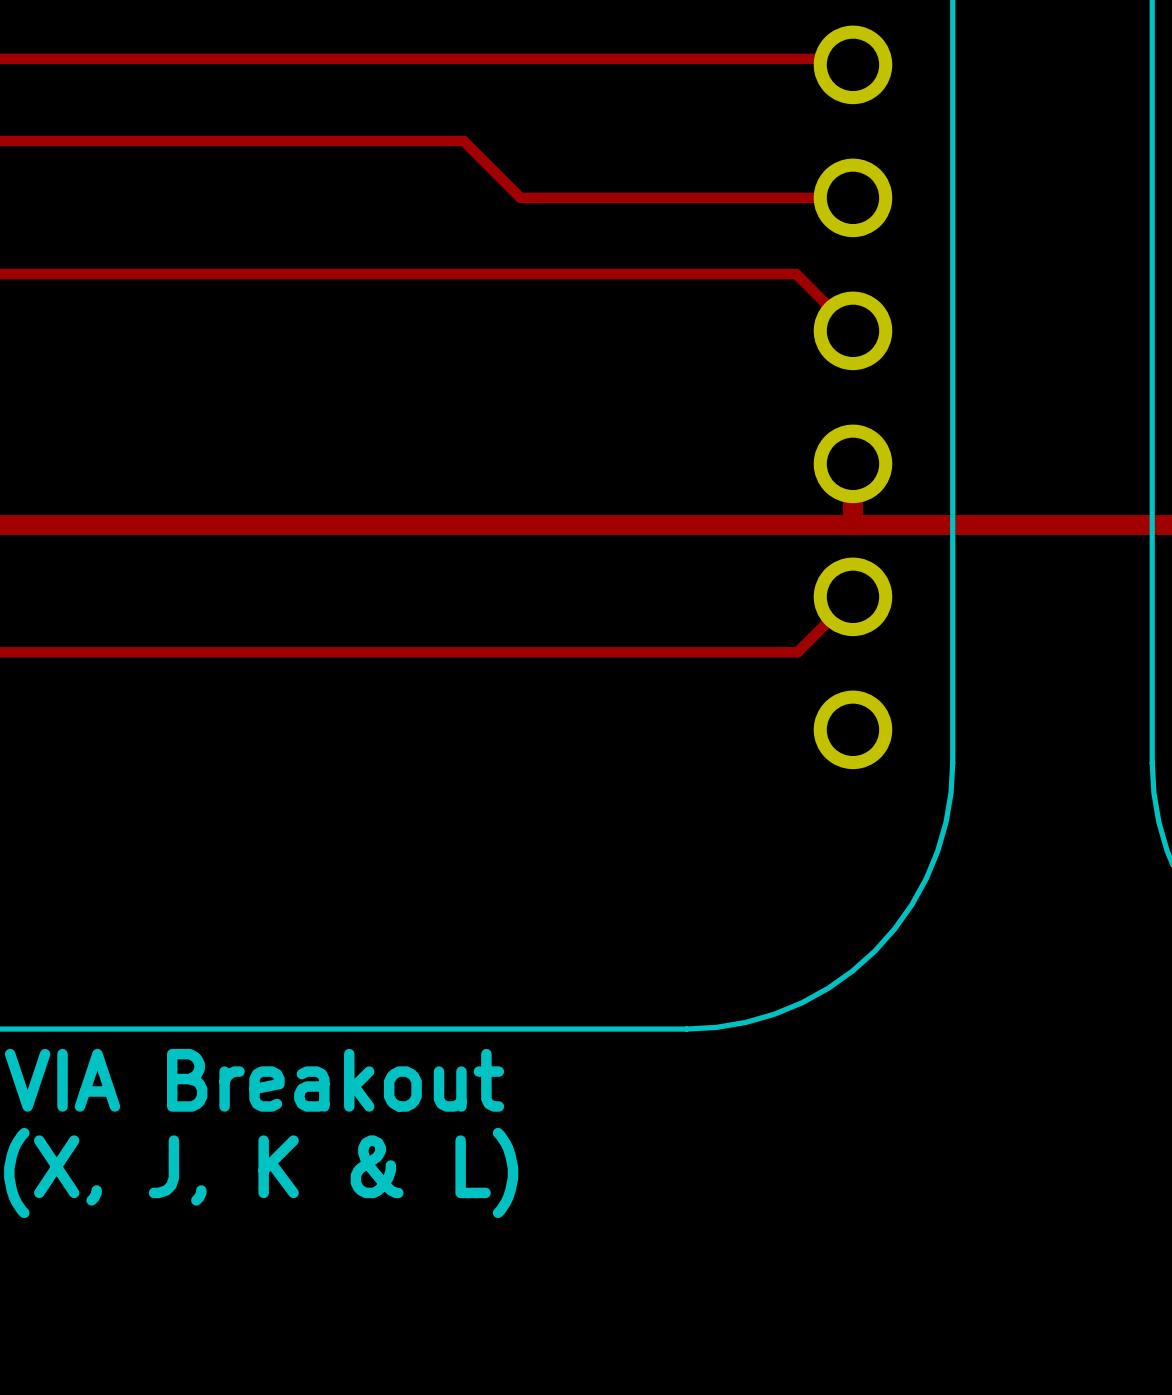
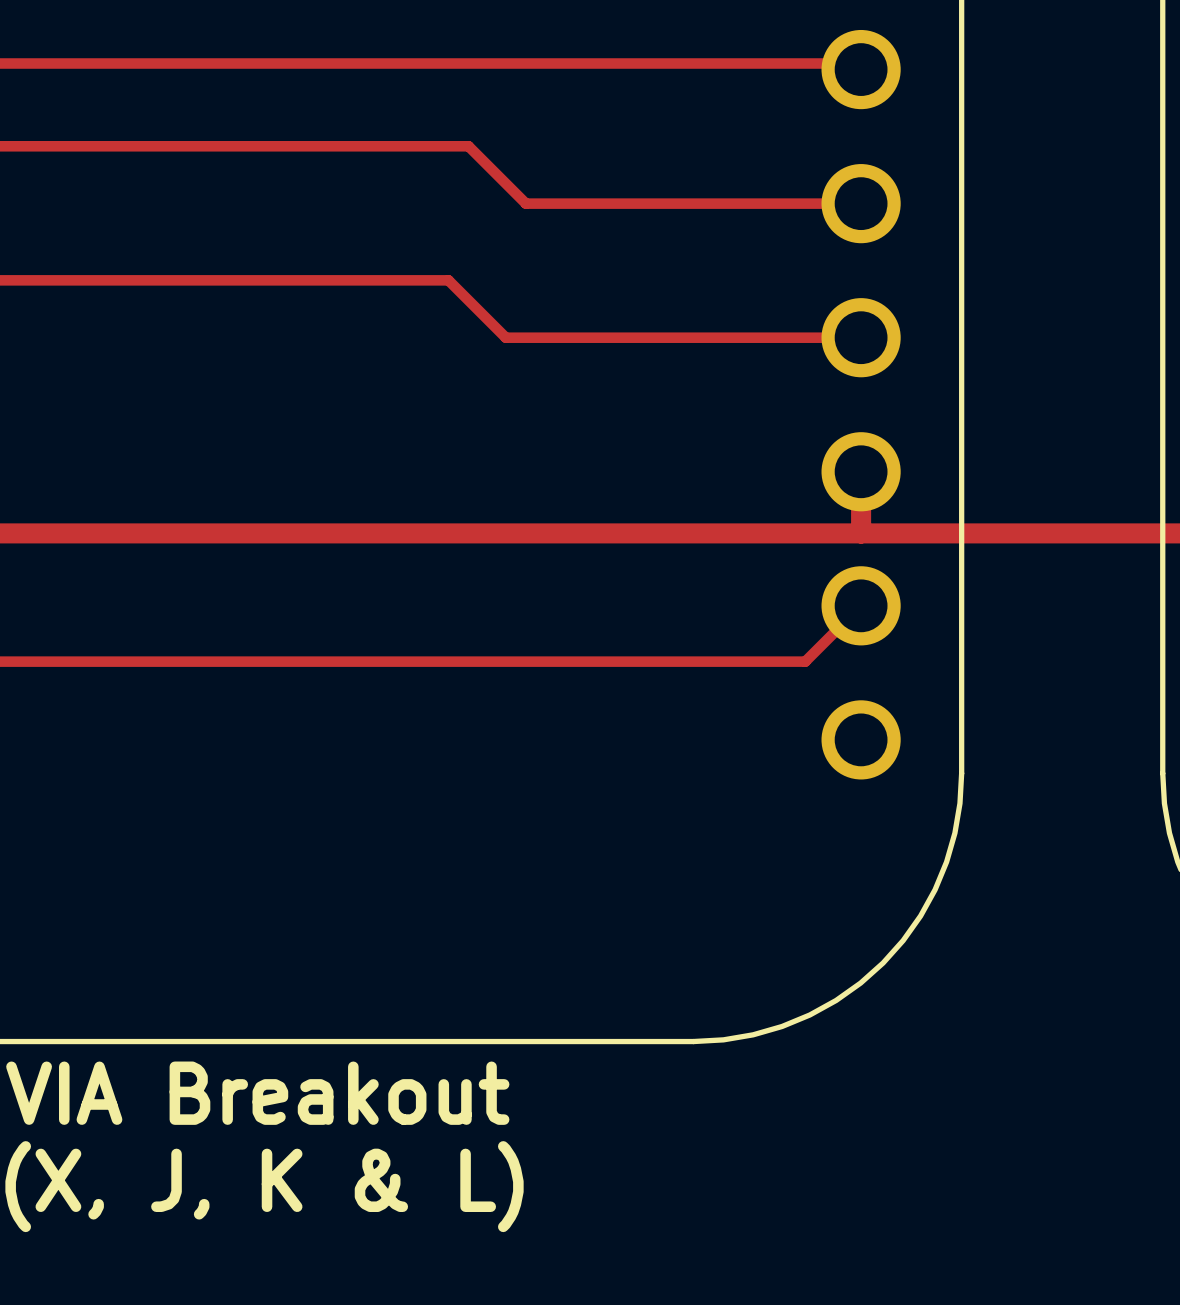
track: (443, 273) (796, 273) (852, 330) -> (448, 280) (505, 337) (861, 337)

